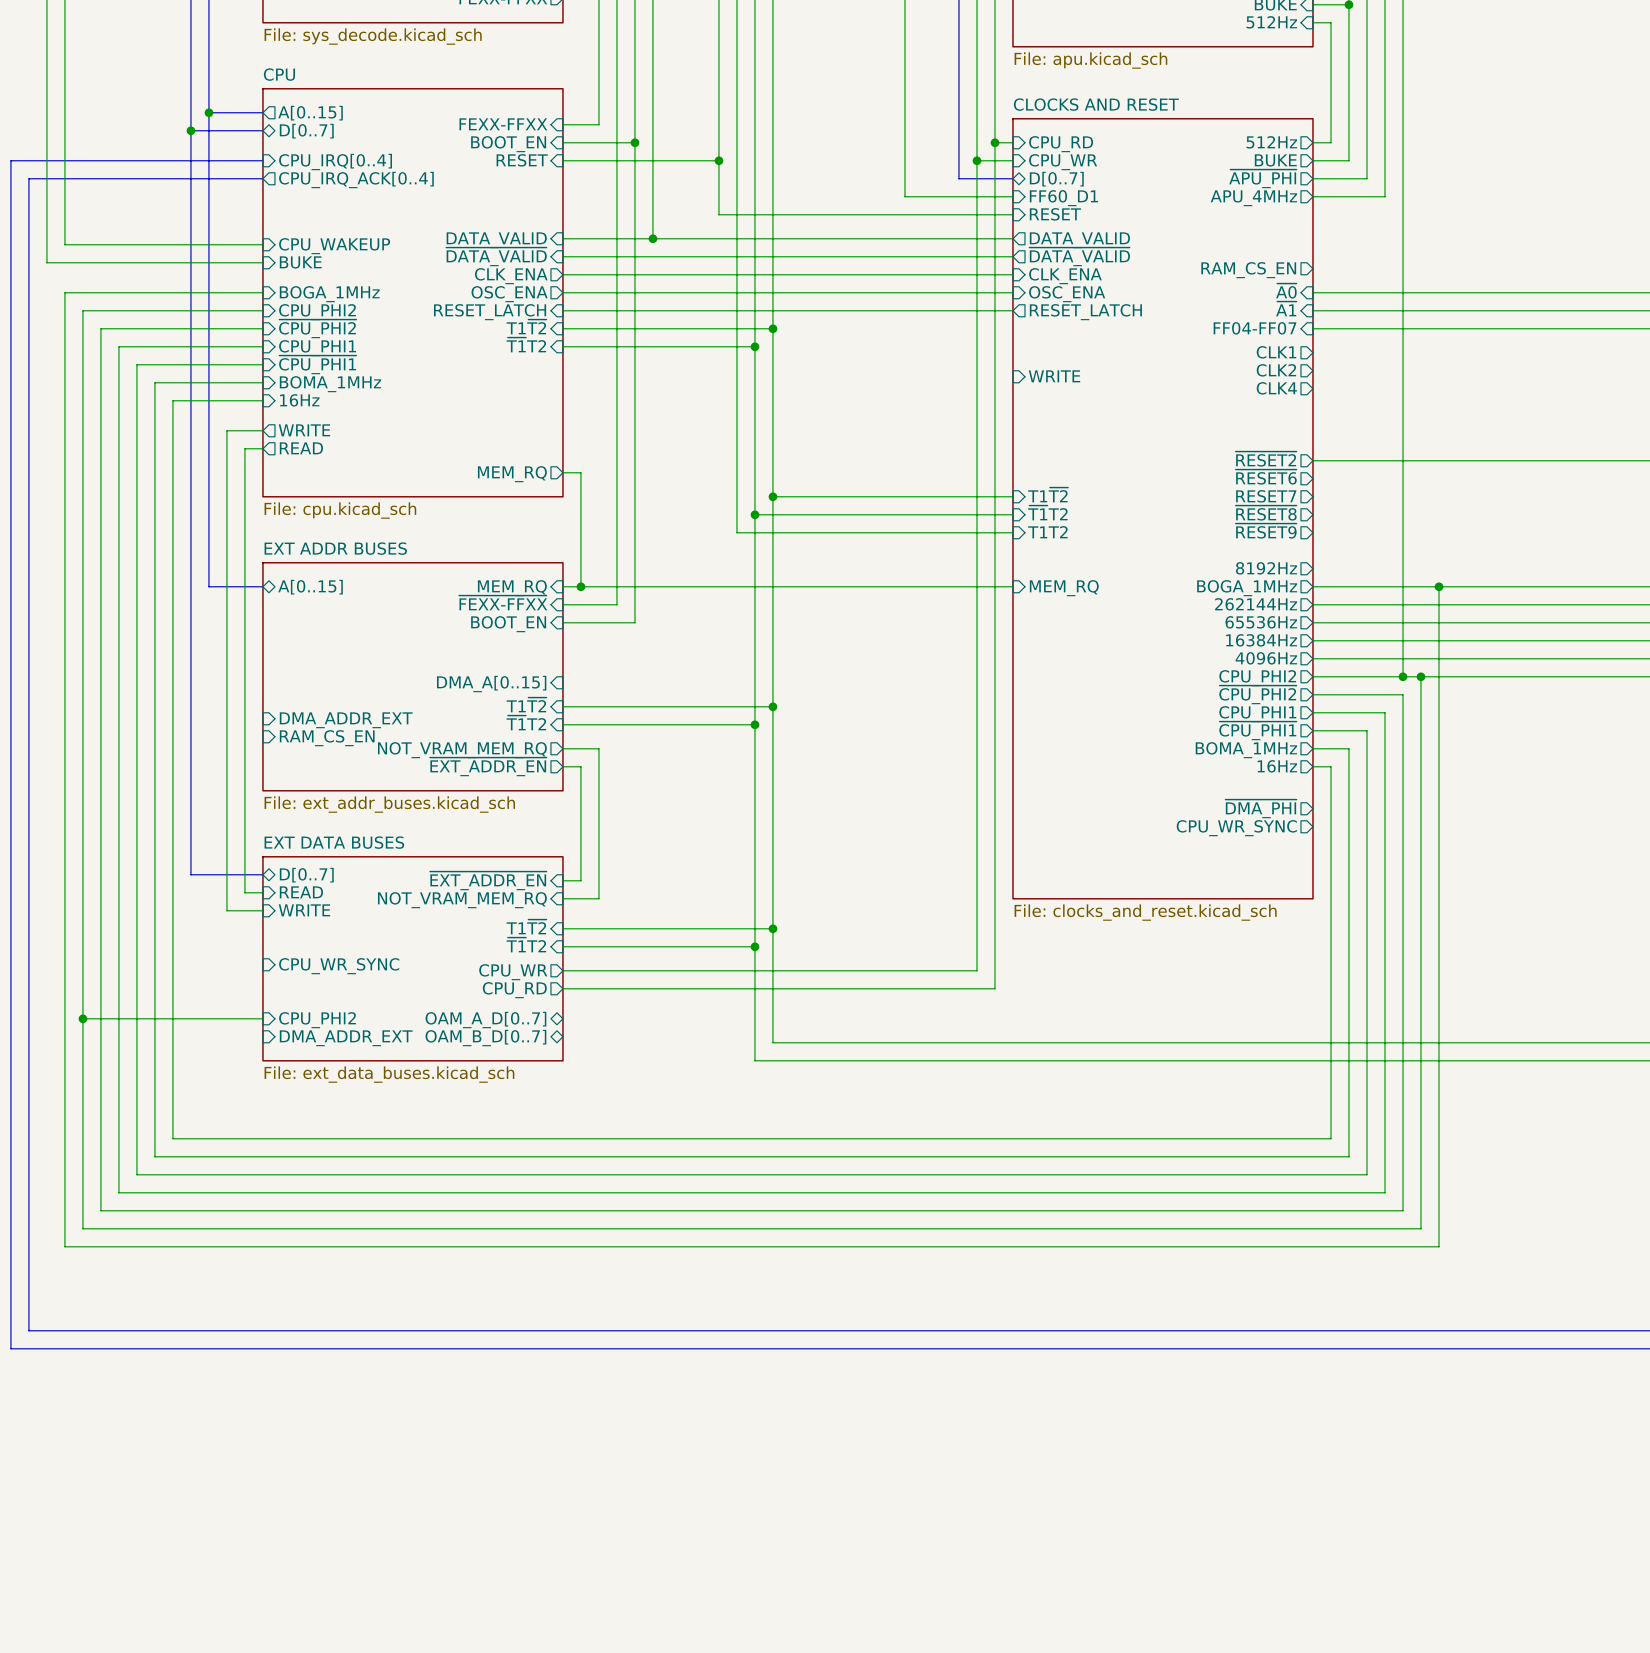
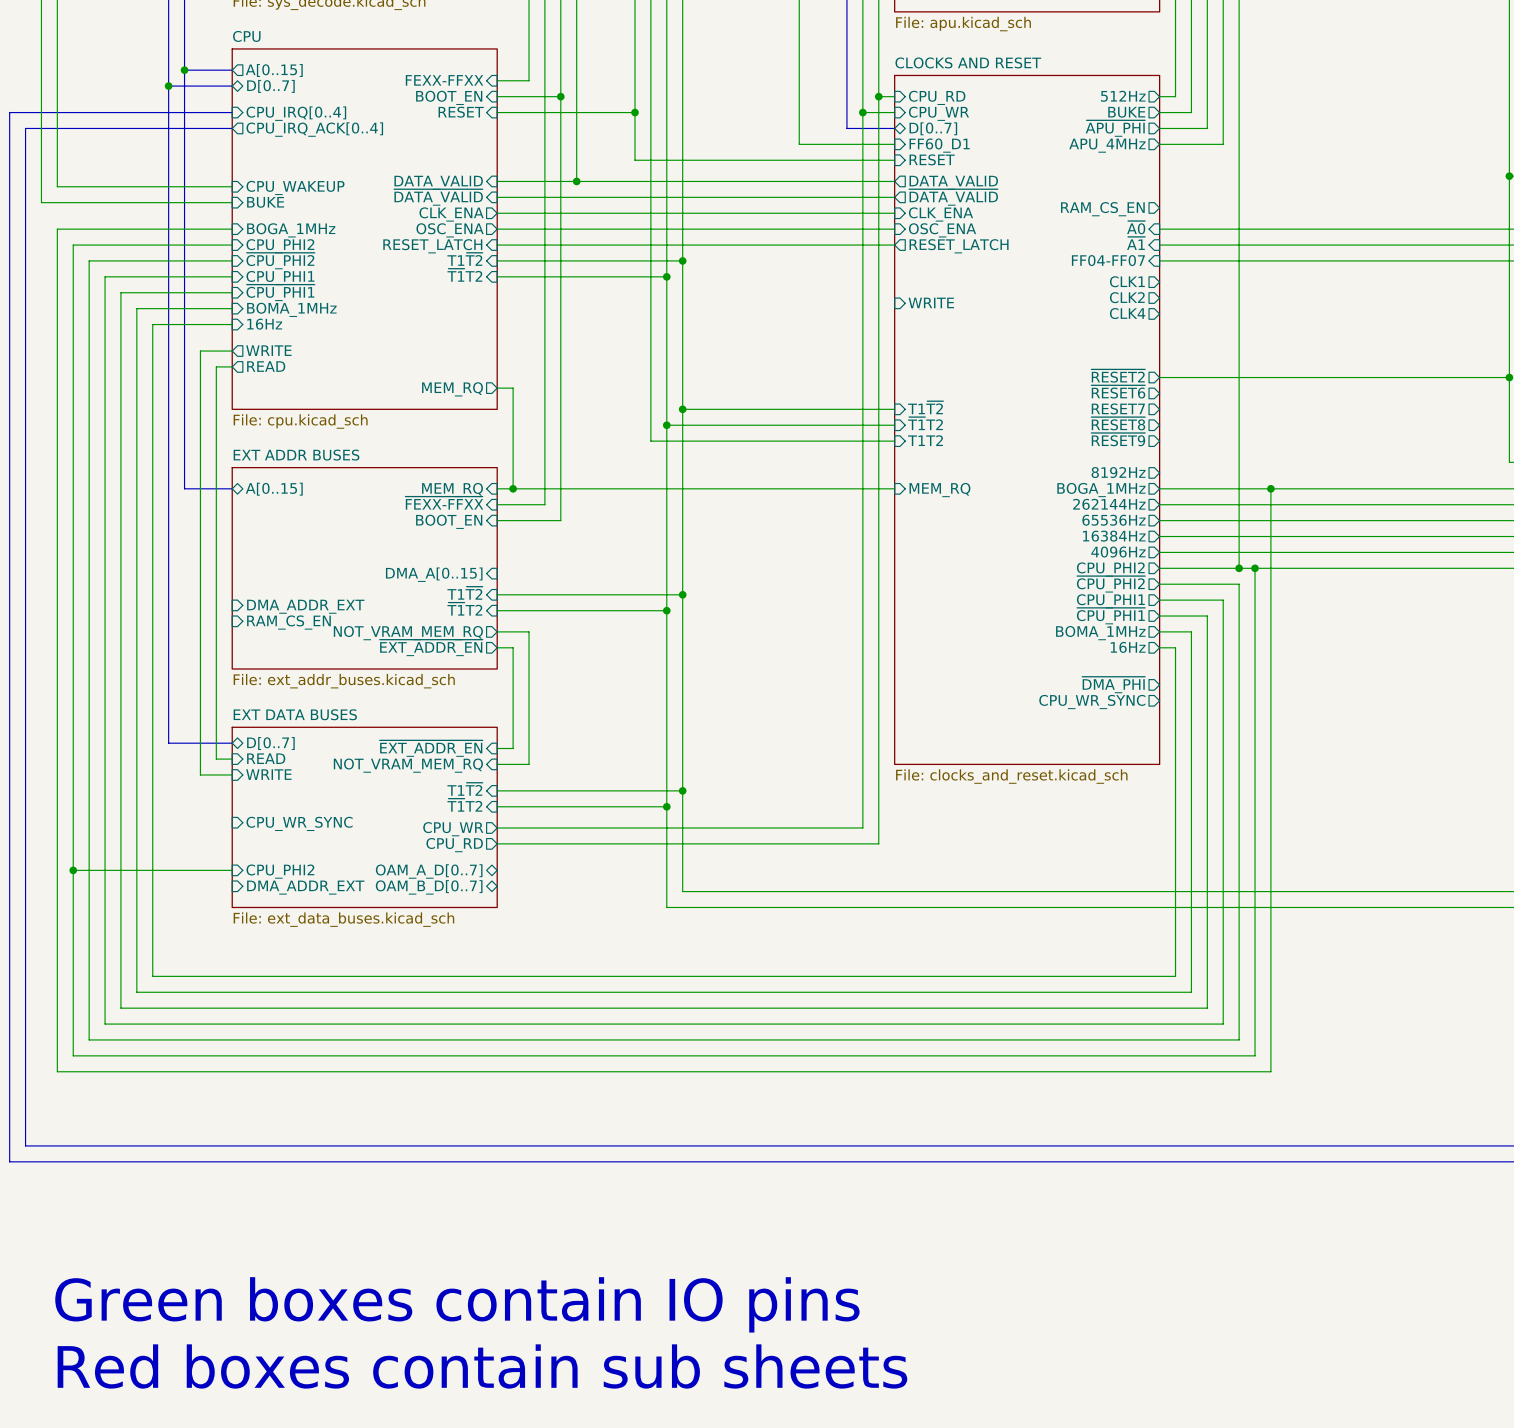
text: none -> Green boxes contain IO pins (457, 1304)
text: none -> Red boxes contain sub sheets (482, 1366)

